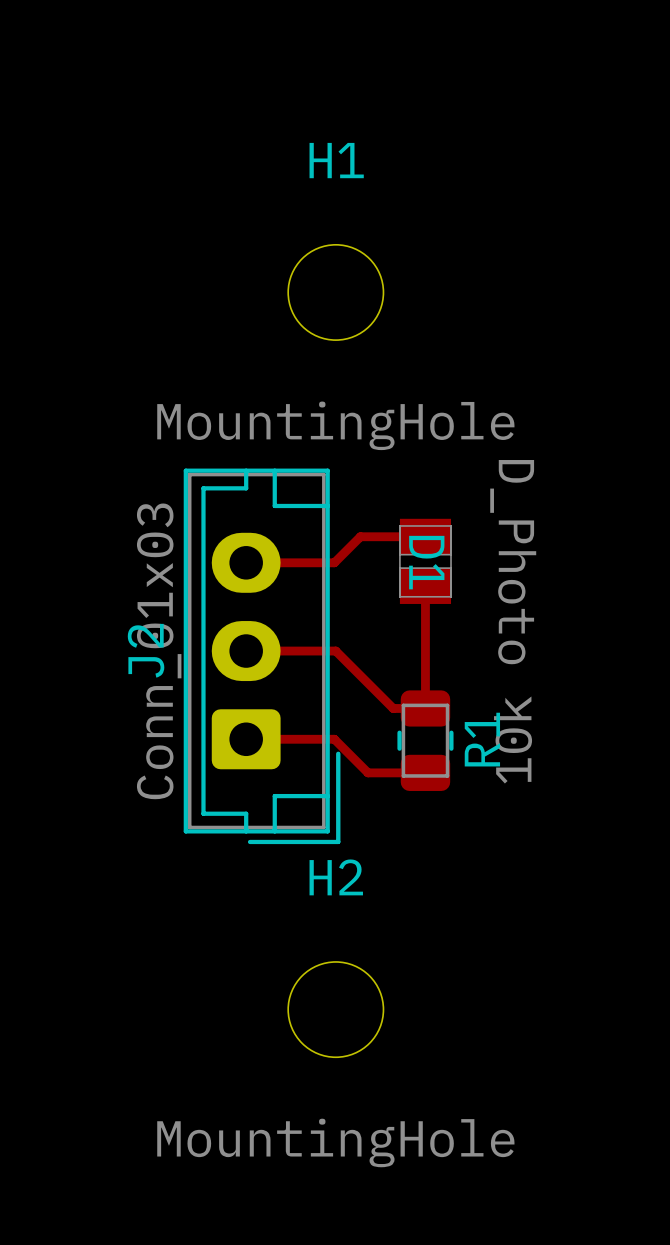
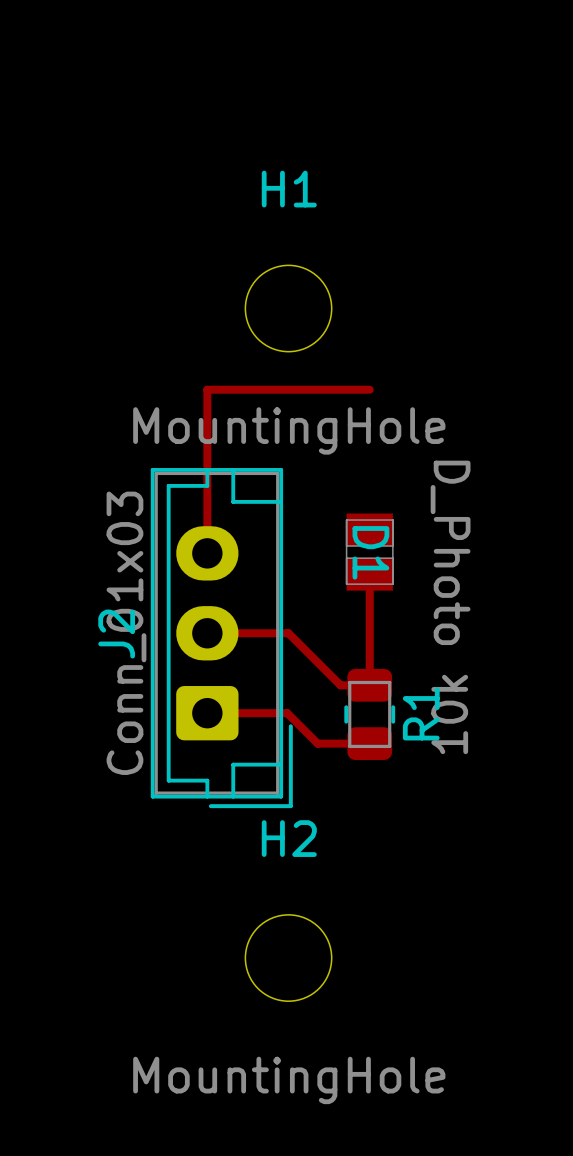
top track: (425, 536) (360, 536) (334, 562) (246, 562) -> (369, 389) (207, 389) (207, 553)

